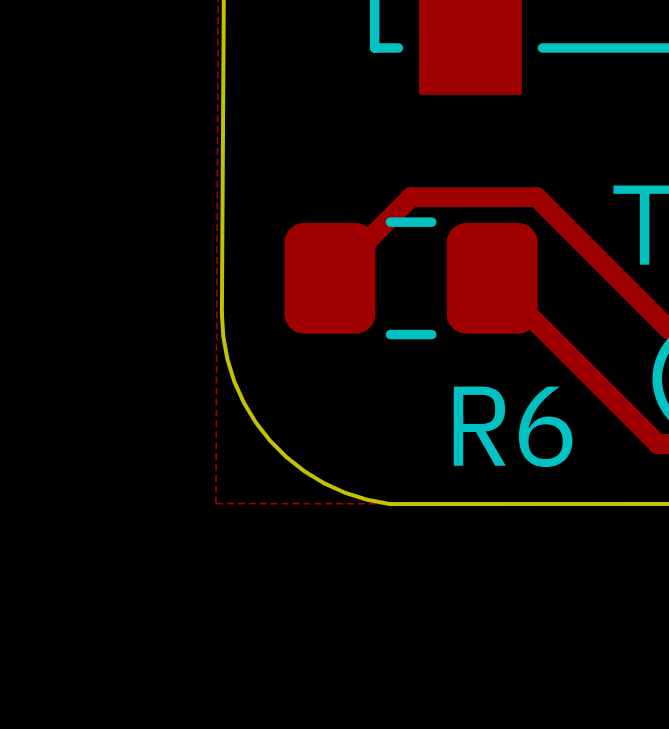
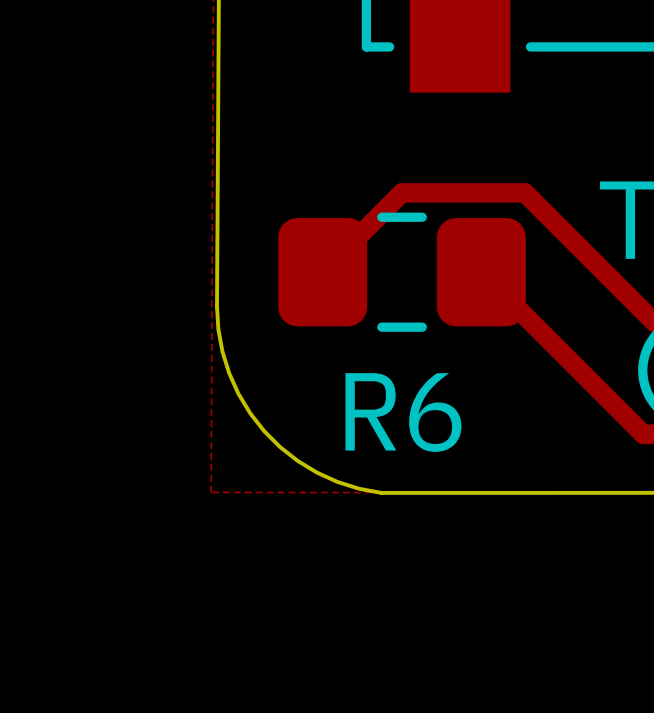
R6 name position: R6 (513, 426) -> R6 (403, 412)

